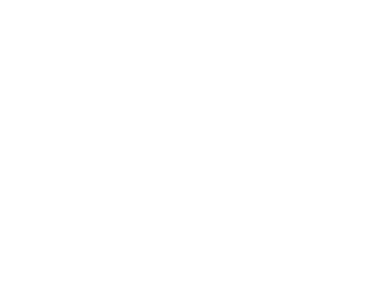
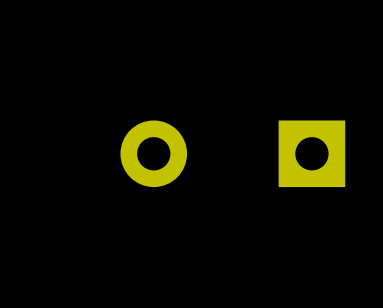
part: none -> (232, 153)

